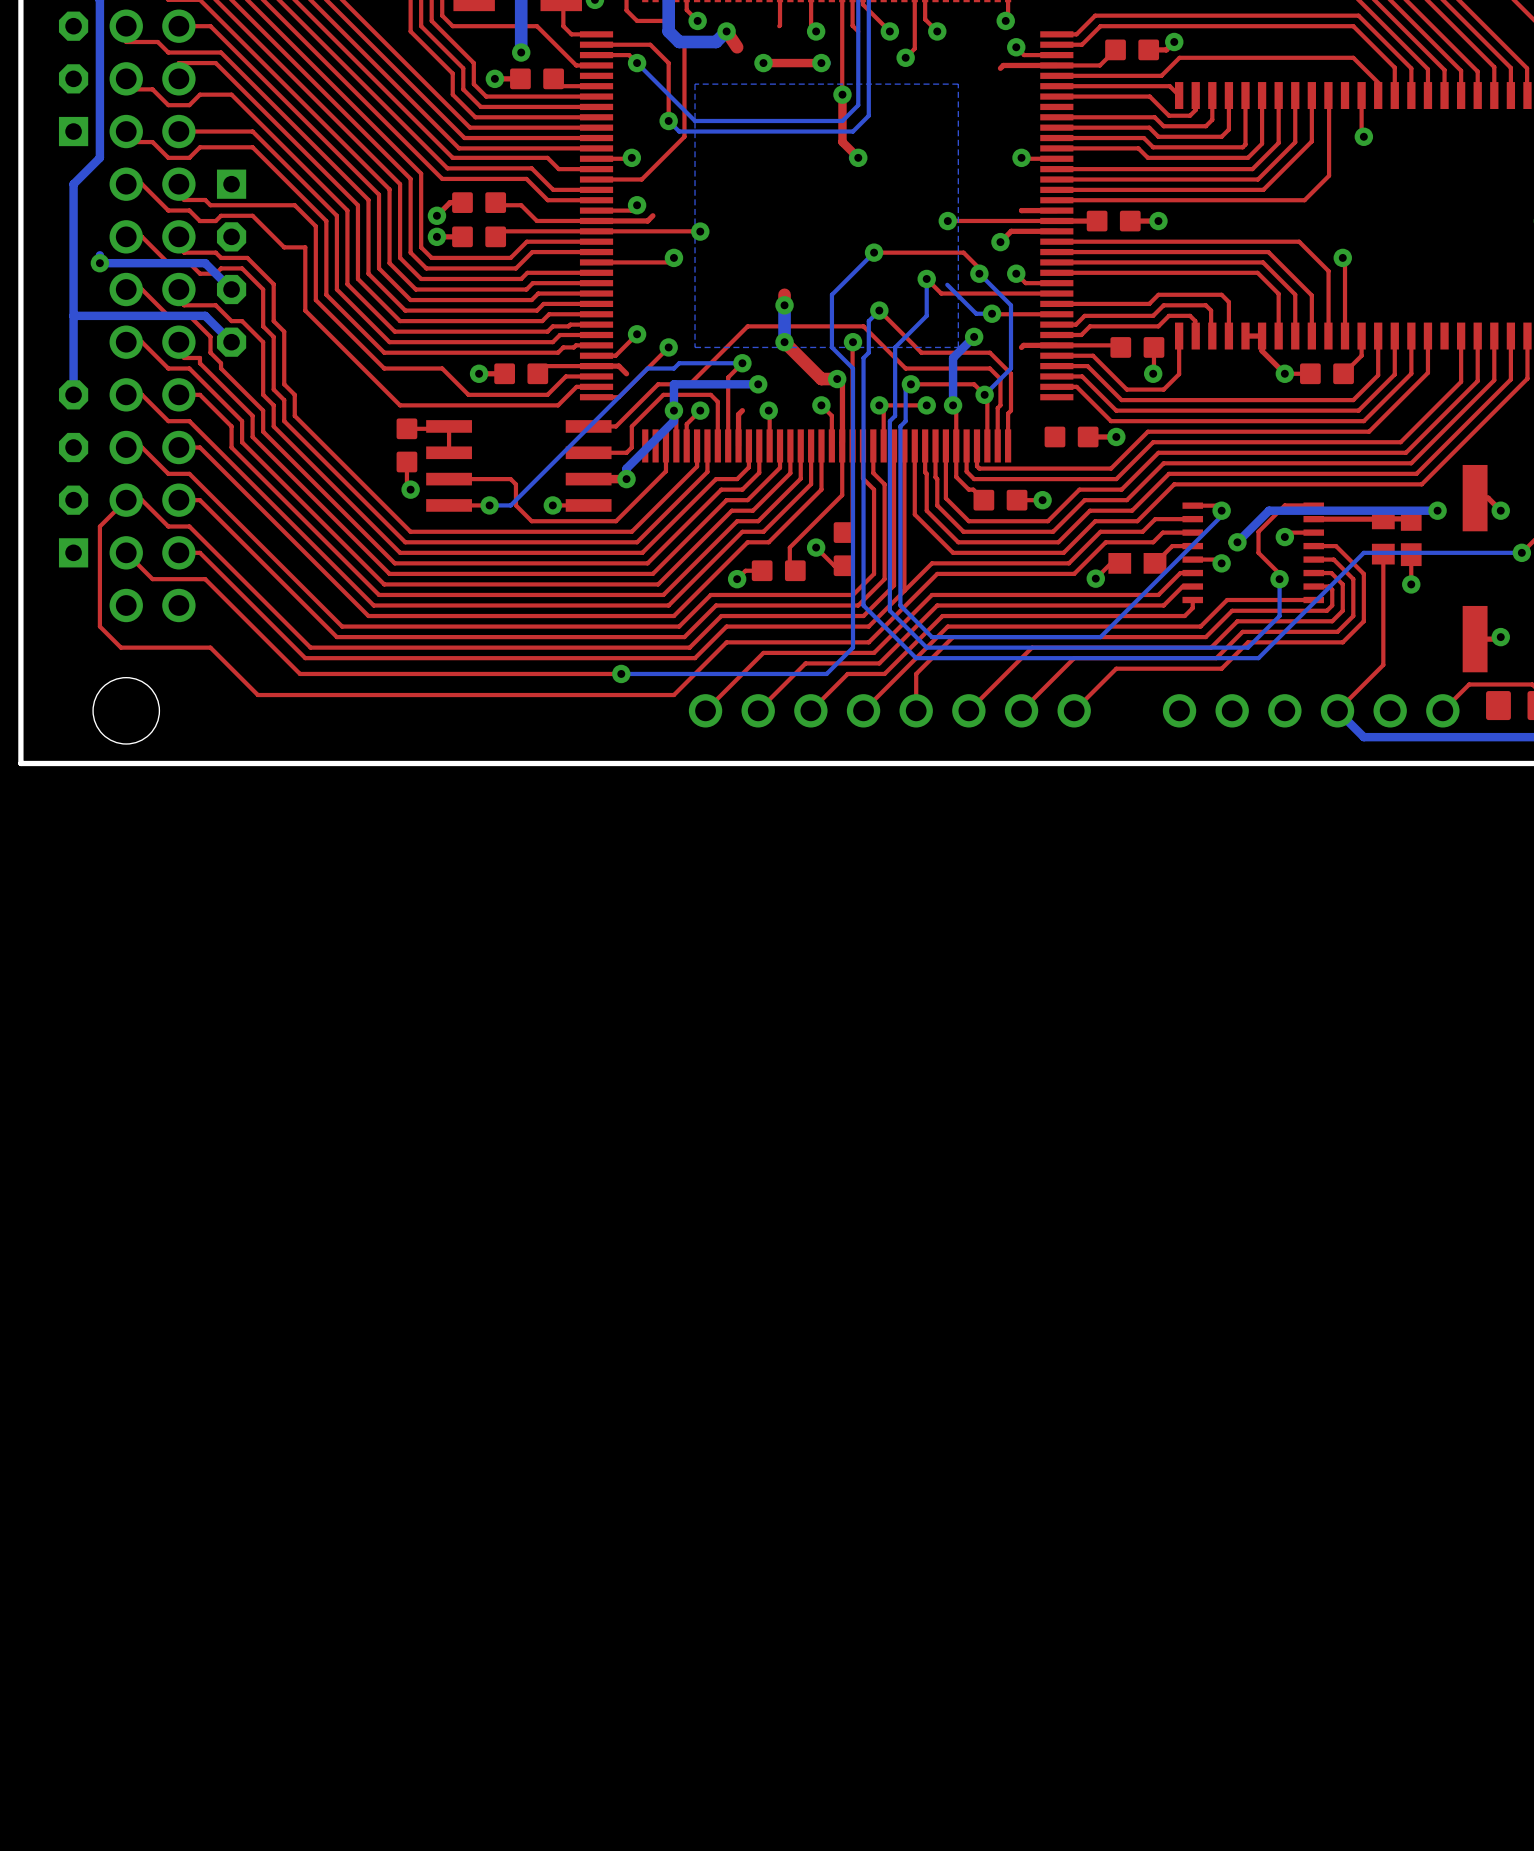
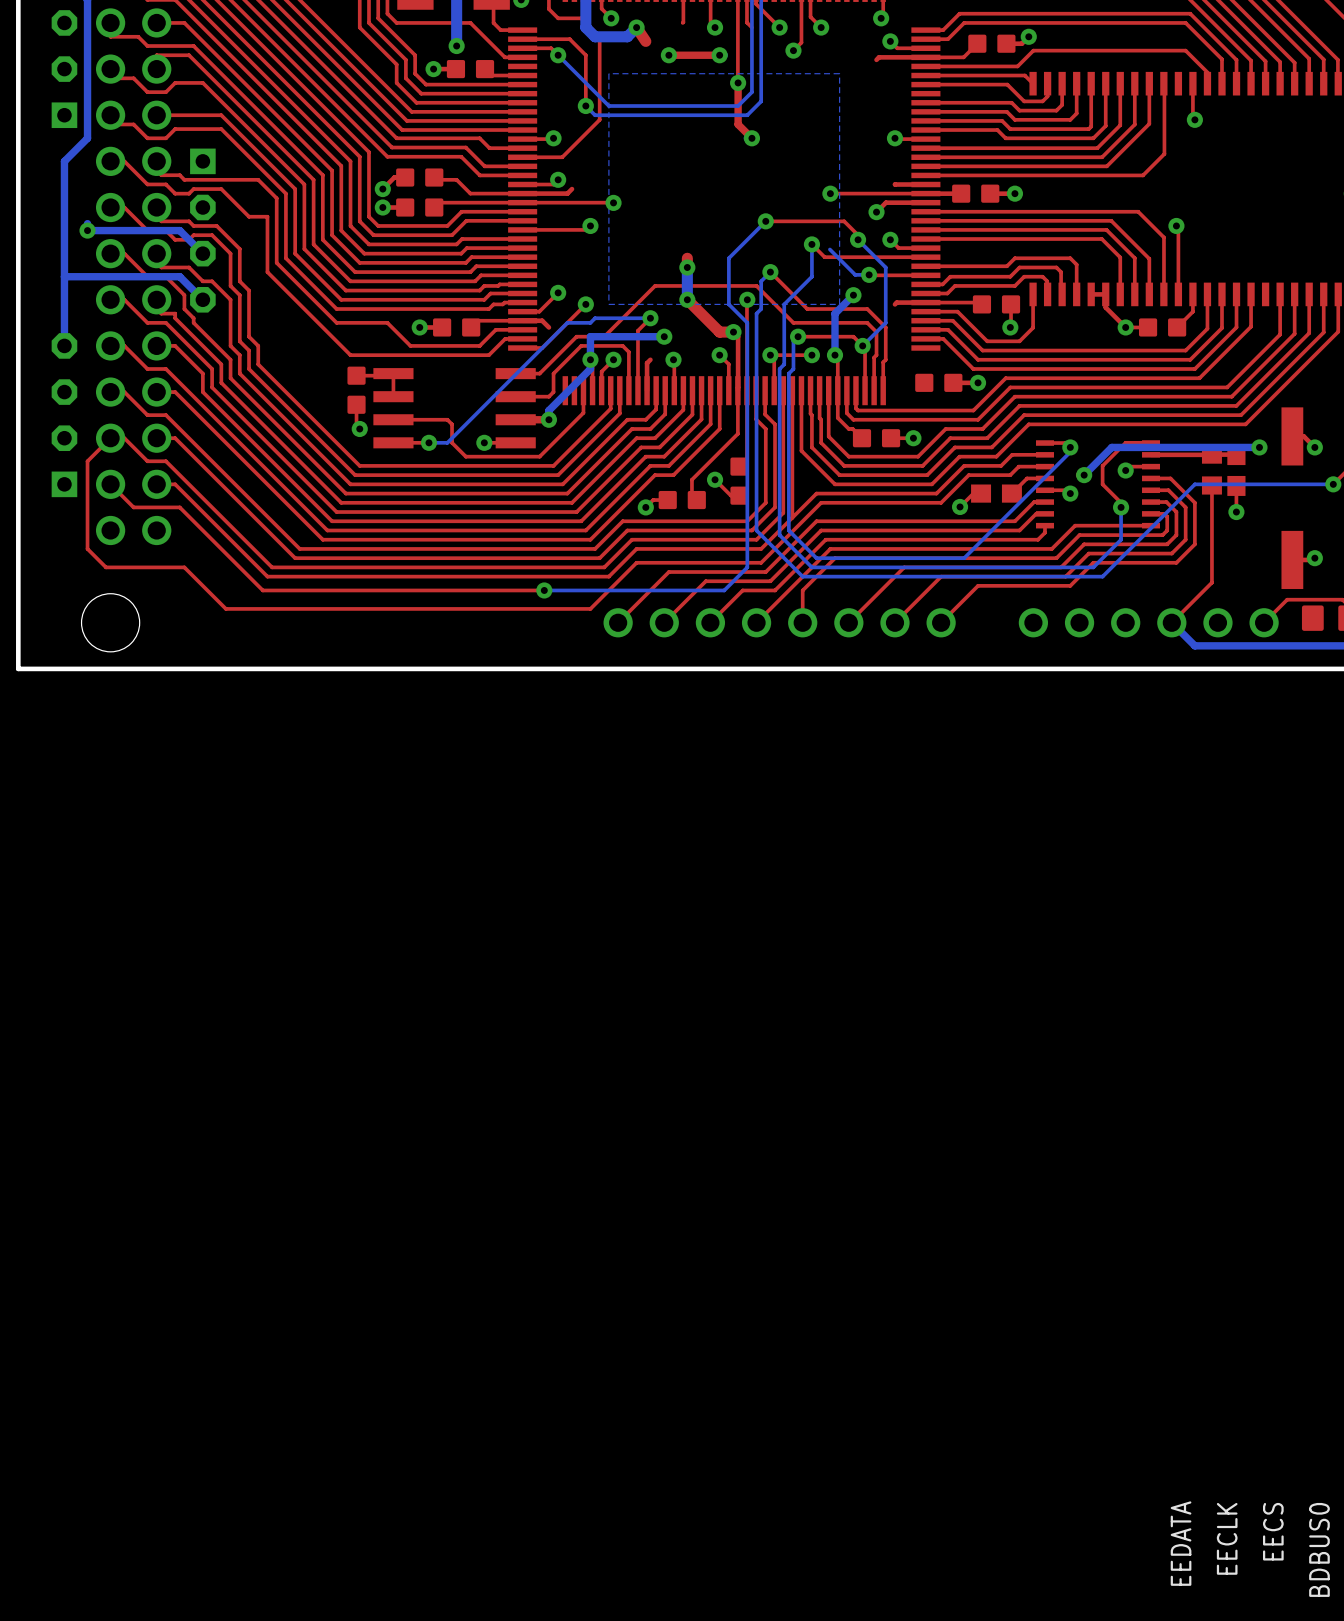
text: none -> EECS (1273, 1531)
text: none -> EECLK (1227, 1538)
text: none -> EEDATA (1181, 1543)
text: none -> BDBUS0 (1319, 1549)

